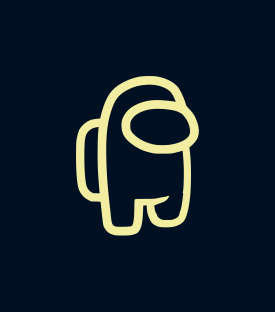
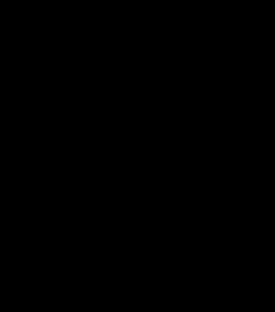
drawing: [76, 76, 199, 236] -> none

